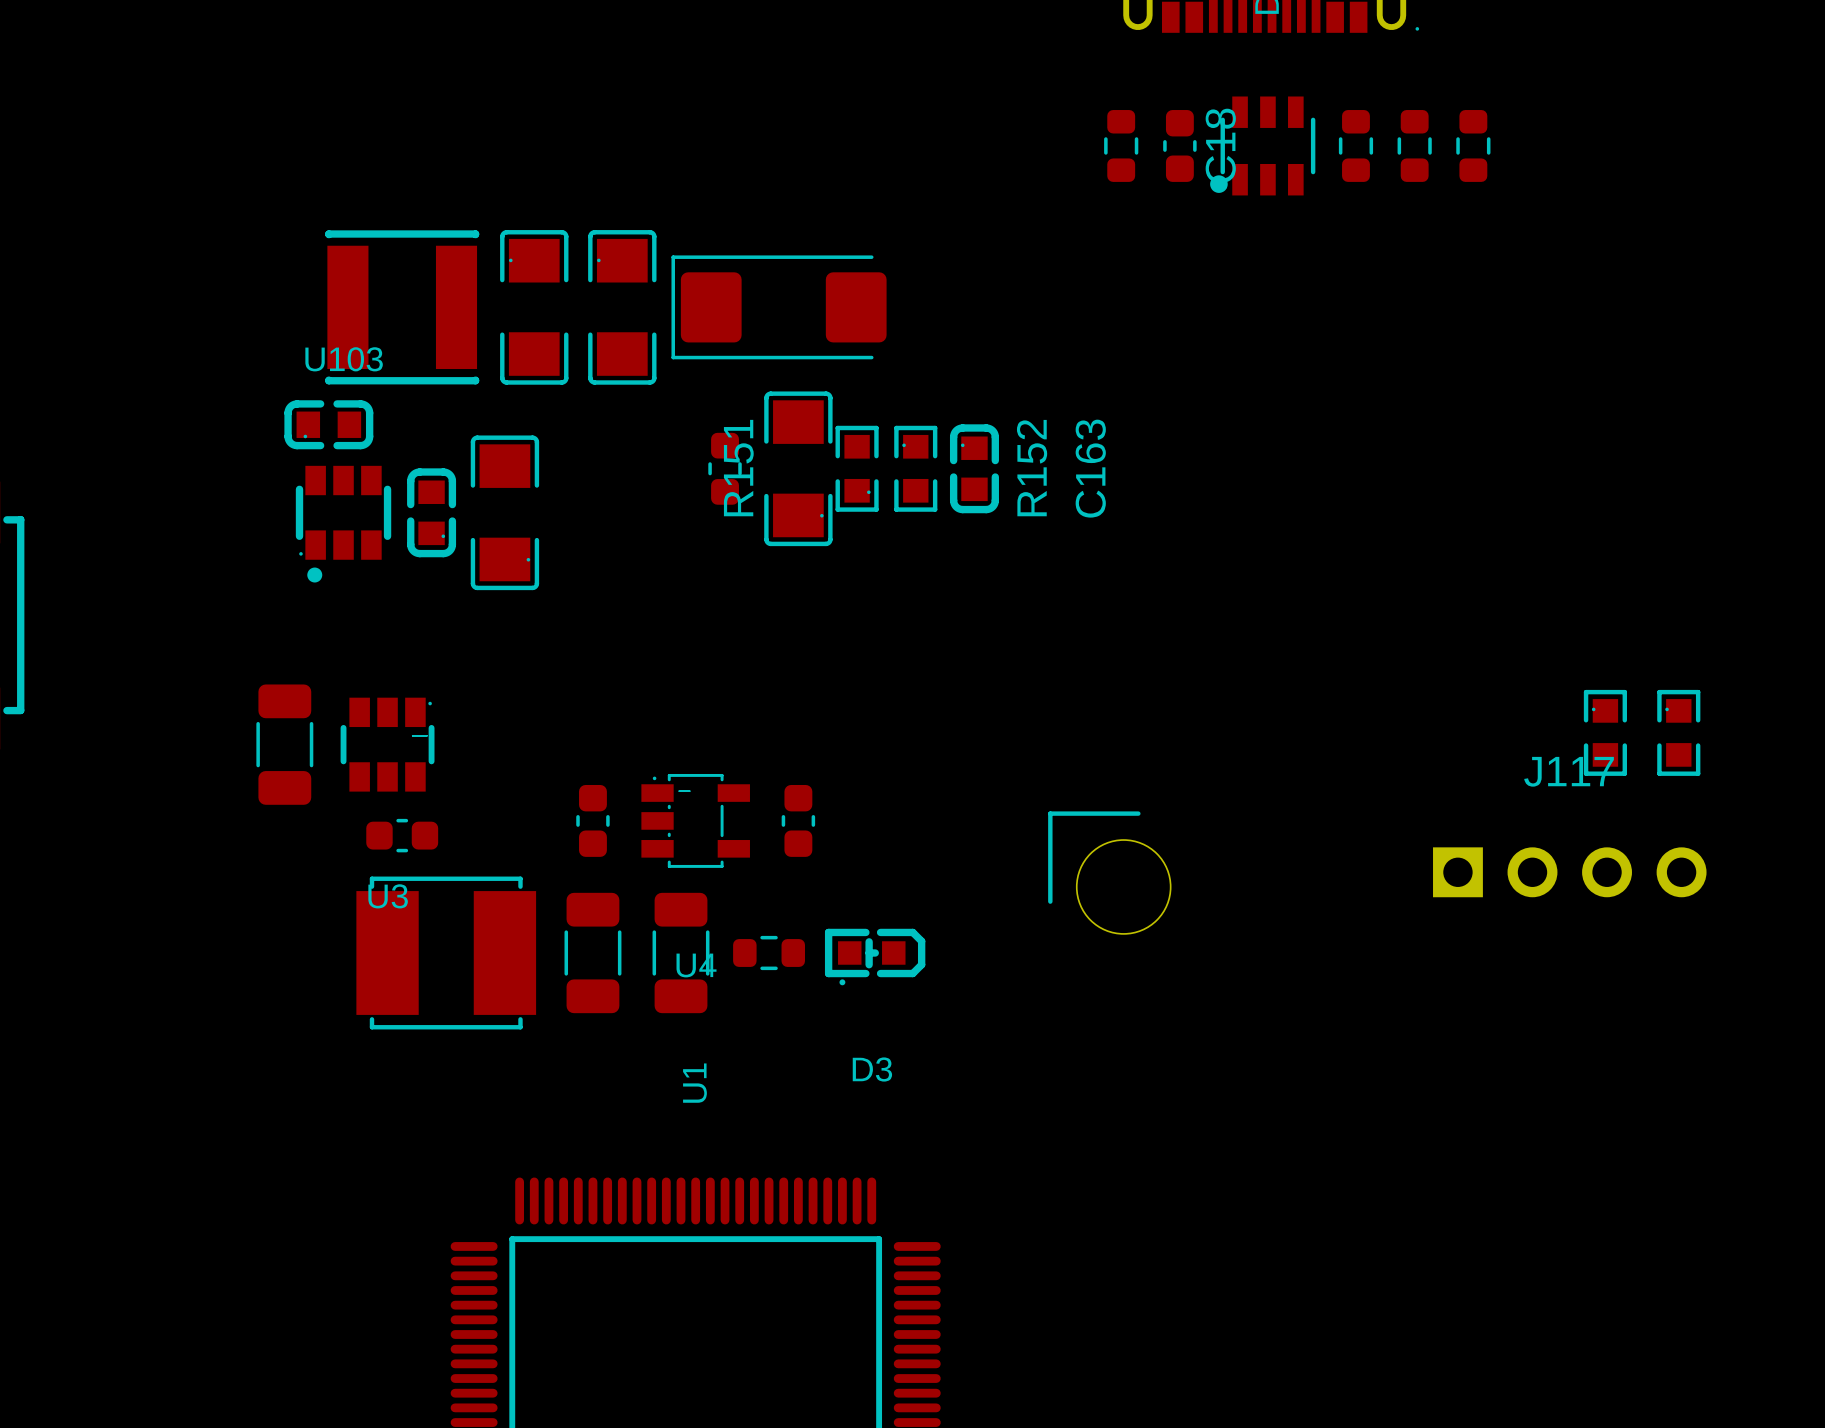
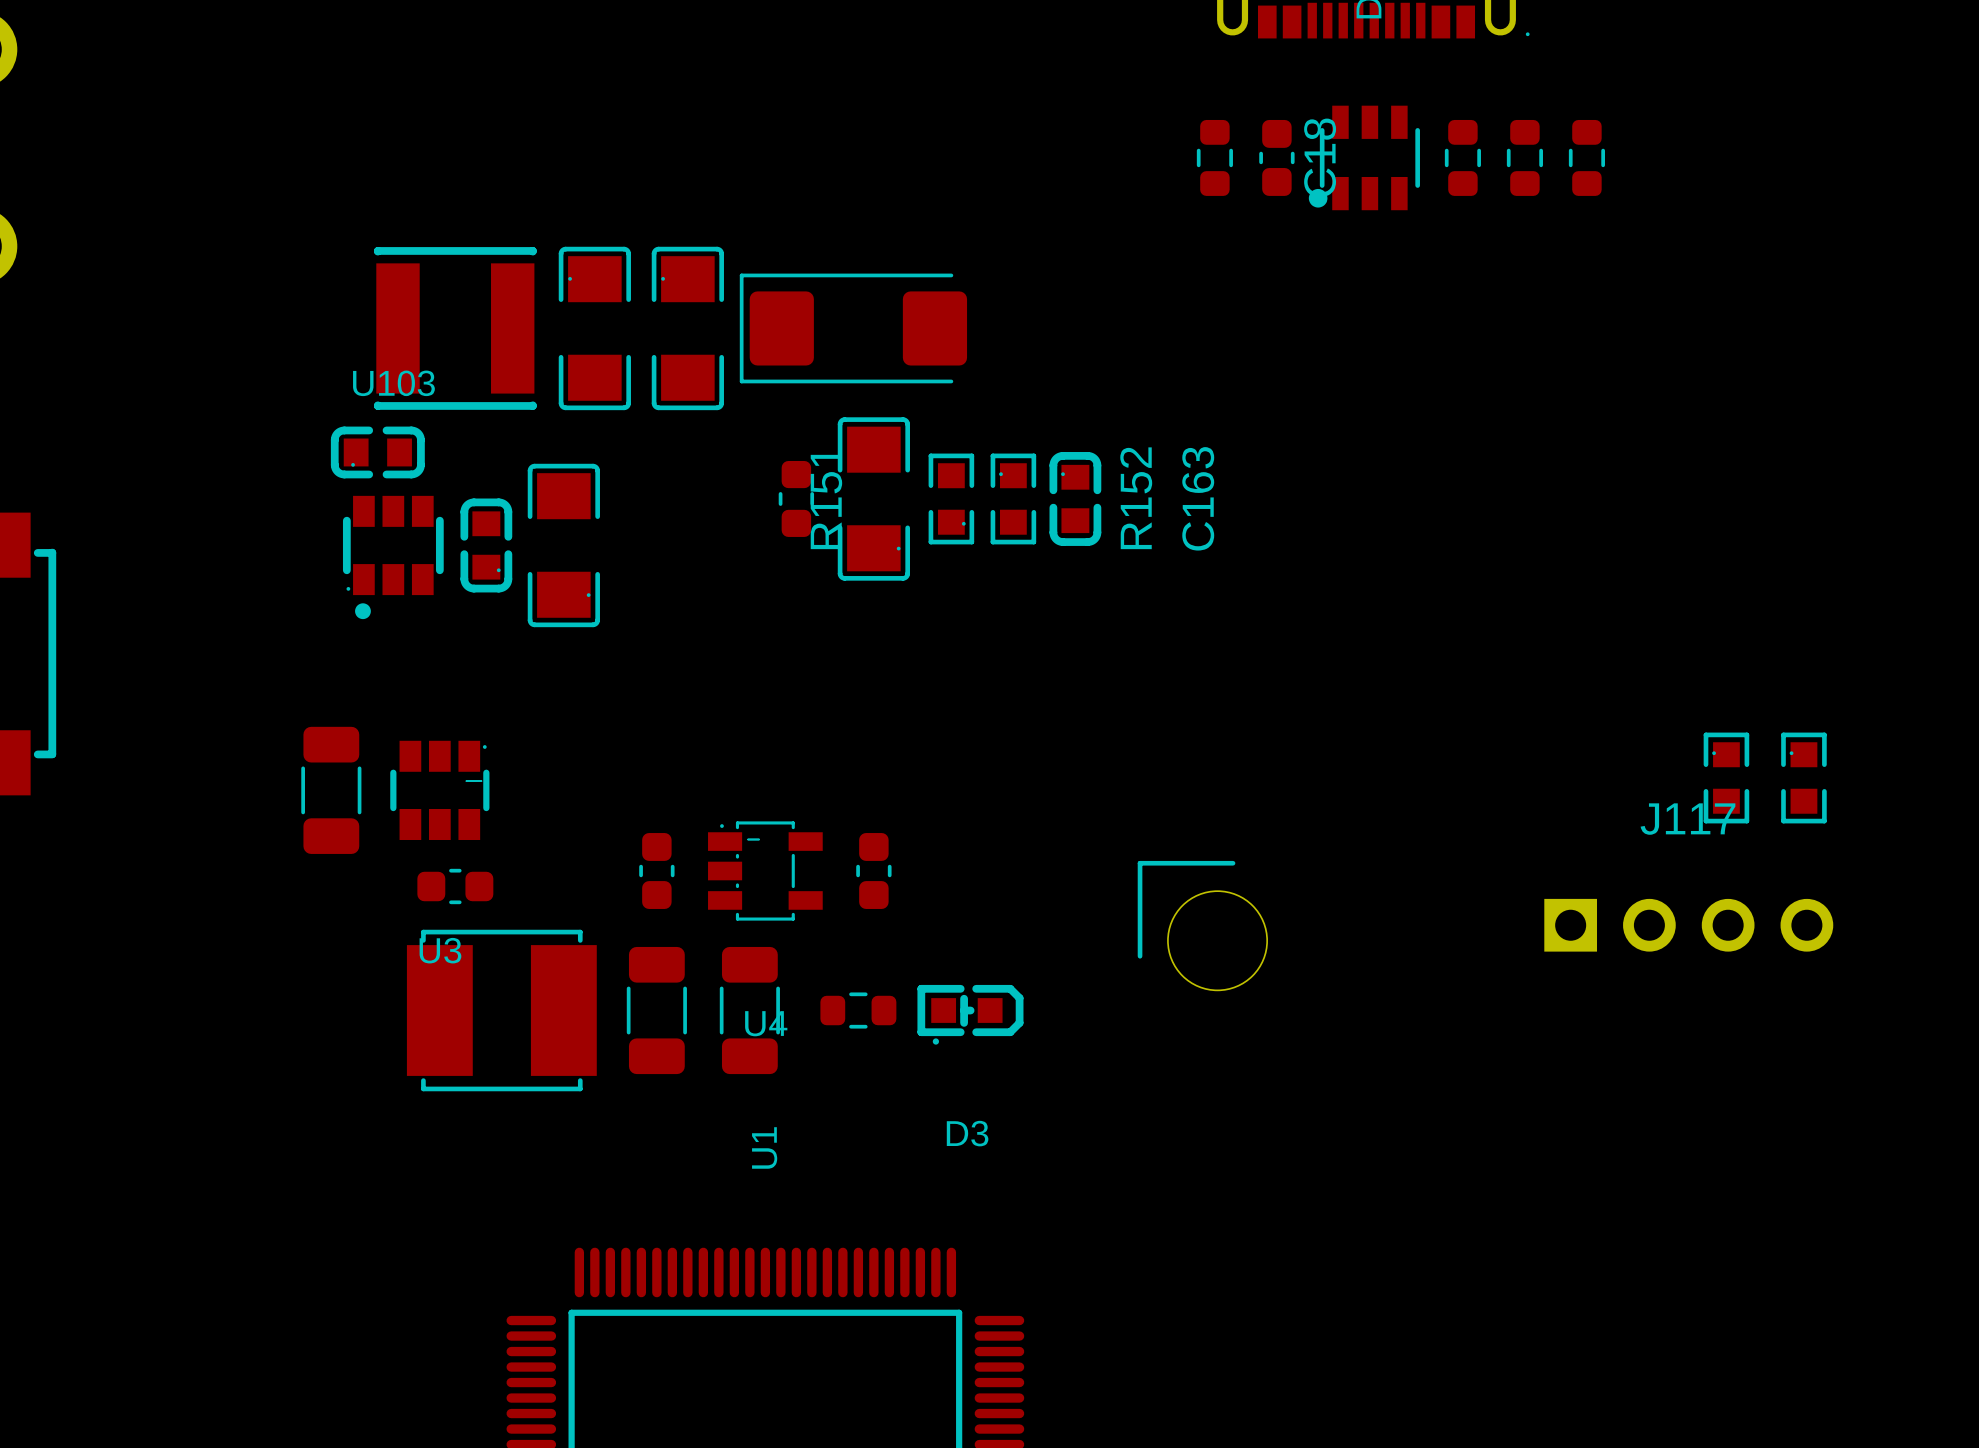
R151 position: (857, 468) -> (951, 498)
R152 position: (915, 468) -> (1013, 498)
C163 position: (974, 468) -> (1075, 498)
part position: (769, 953) -> (858, 1010)
D3 position: (875, 957) -> (970, 1014)

